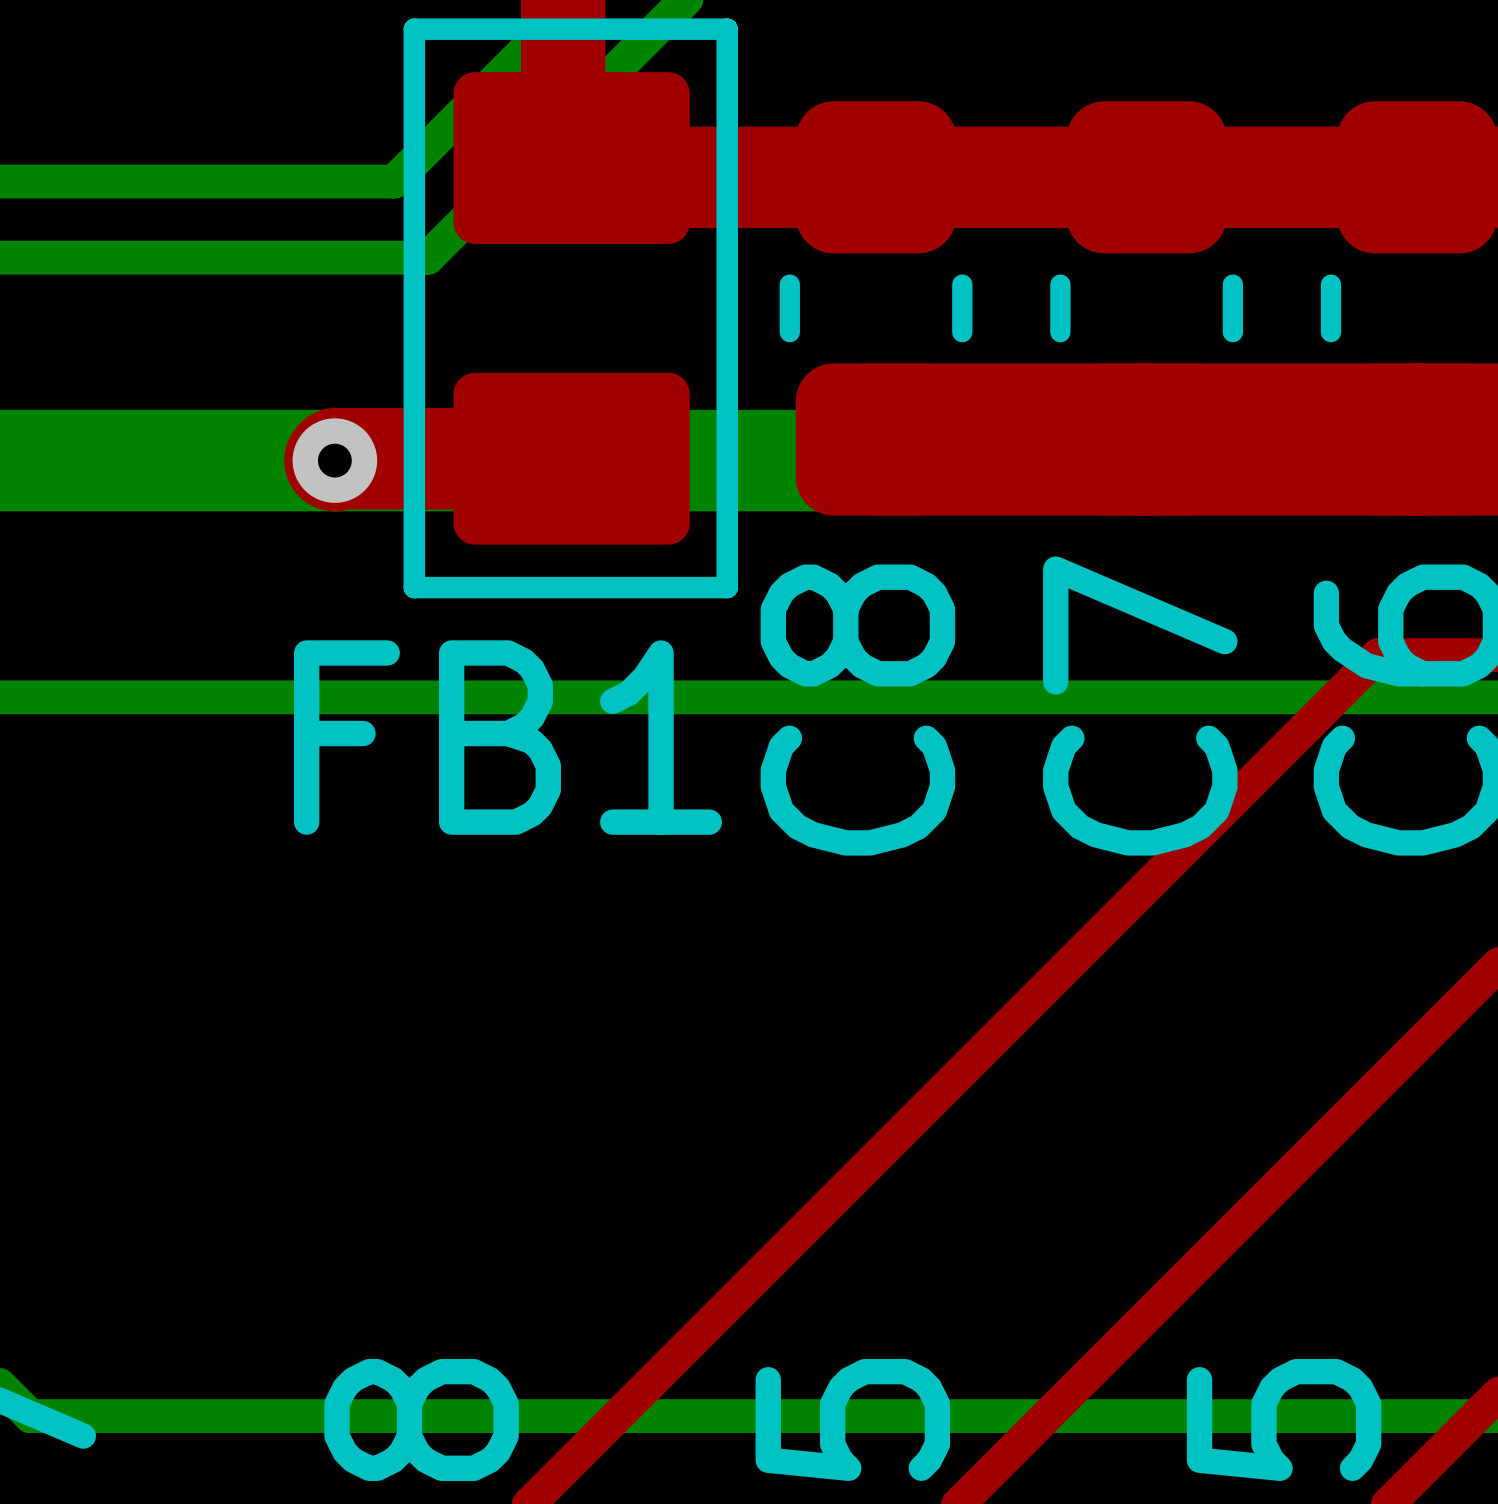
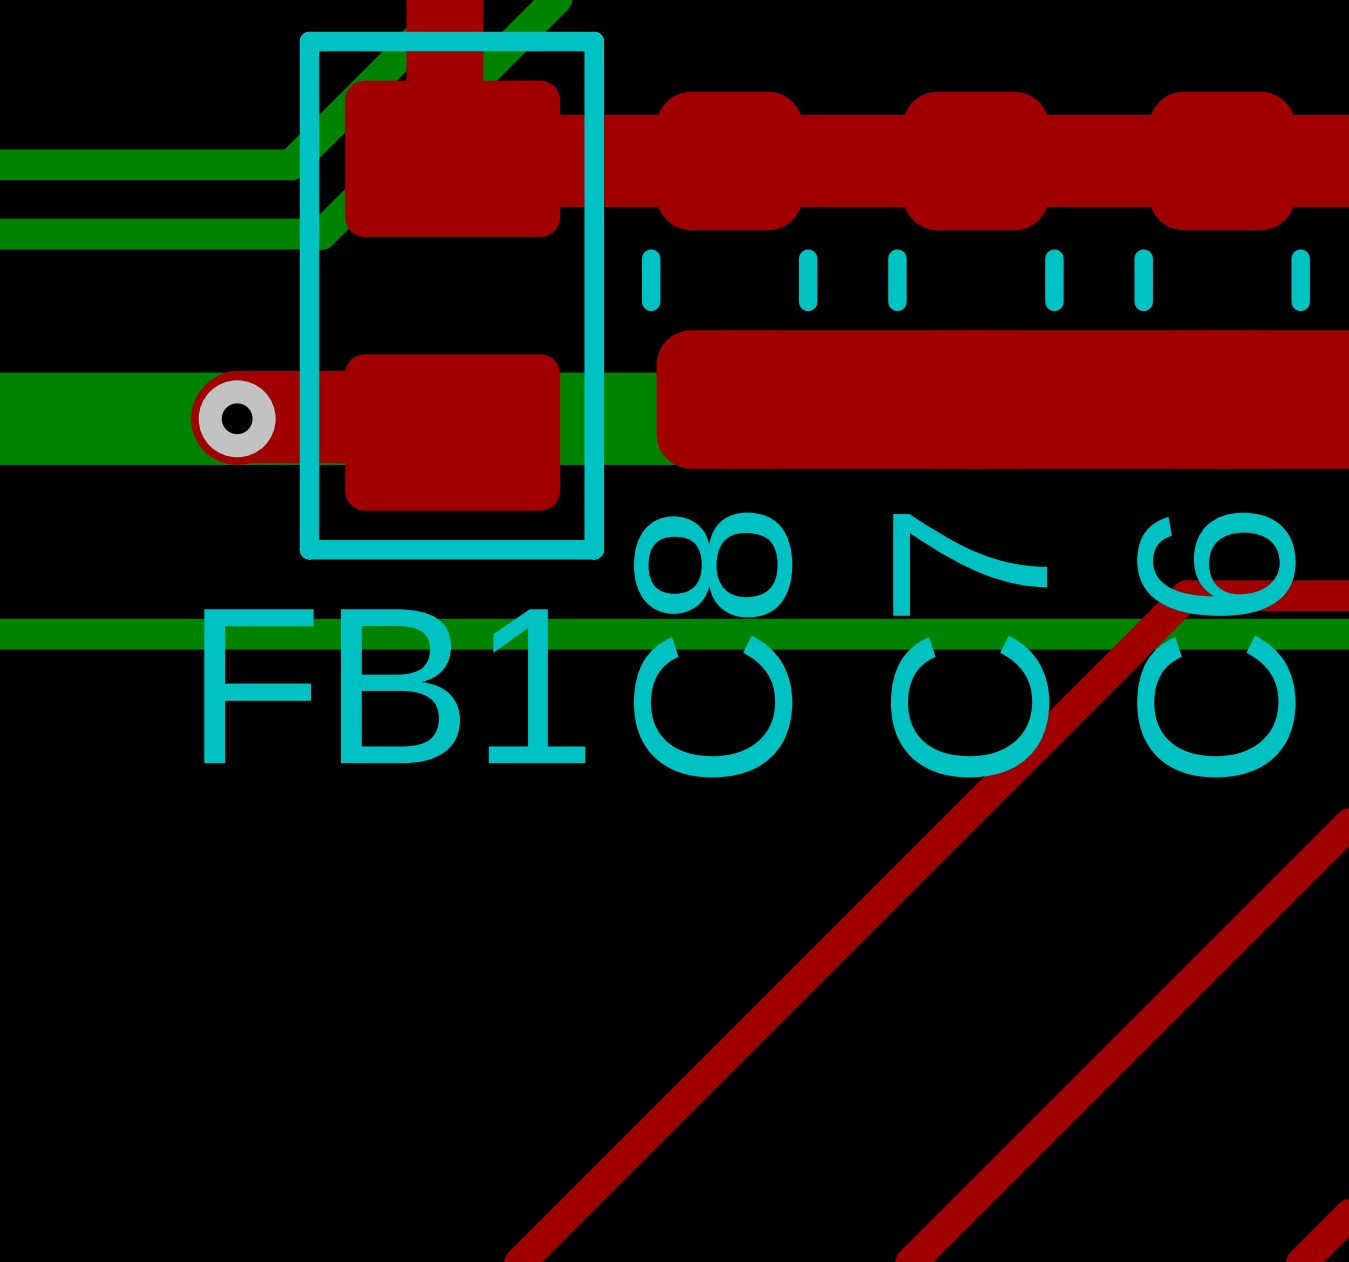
FB1 position: (570, 308) -> (451, 295)

